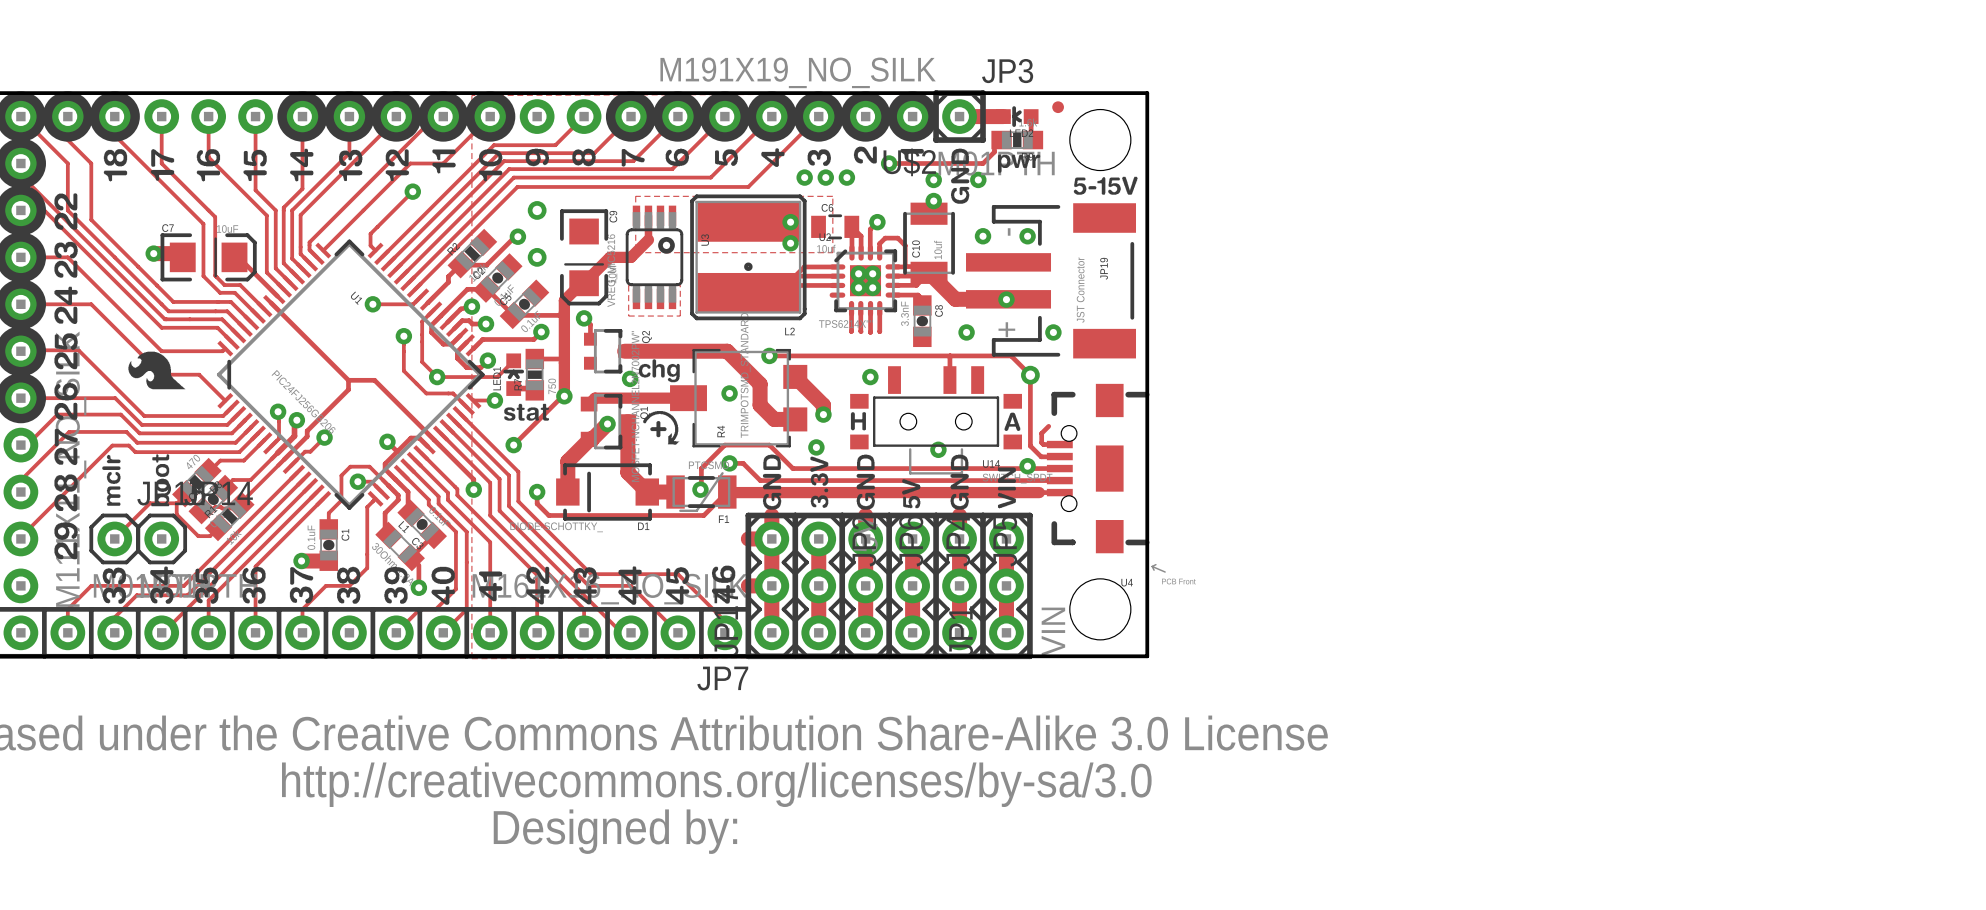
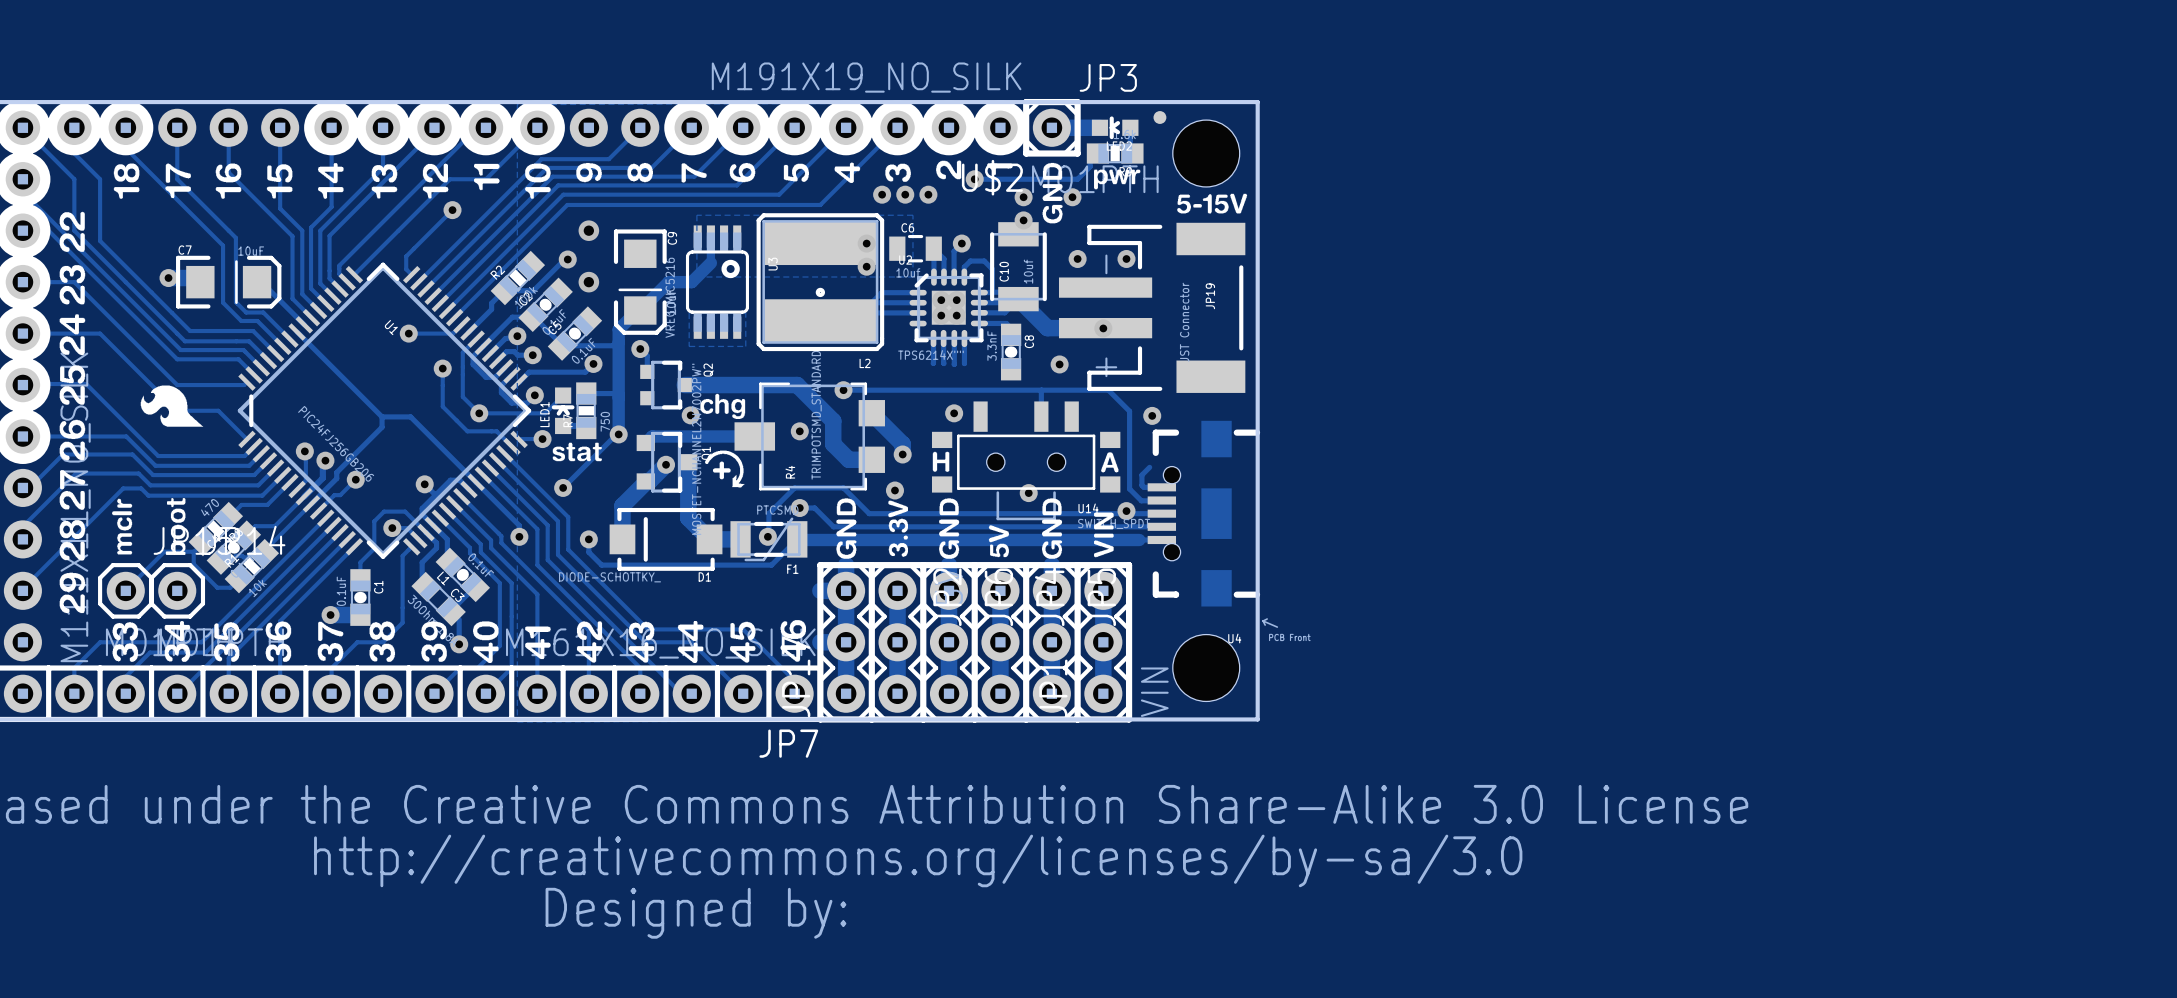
via position: (1053, 332) -> (1152, 415)
via: (1030, 375) -> none

